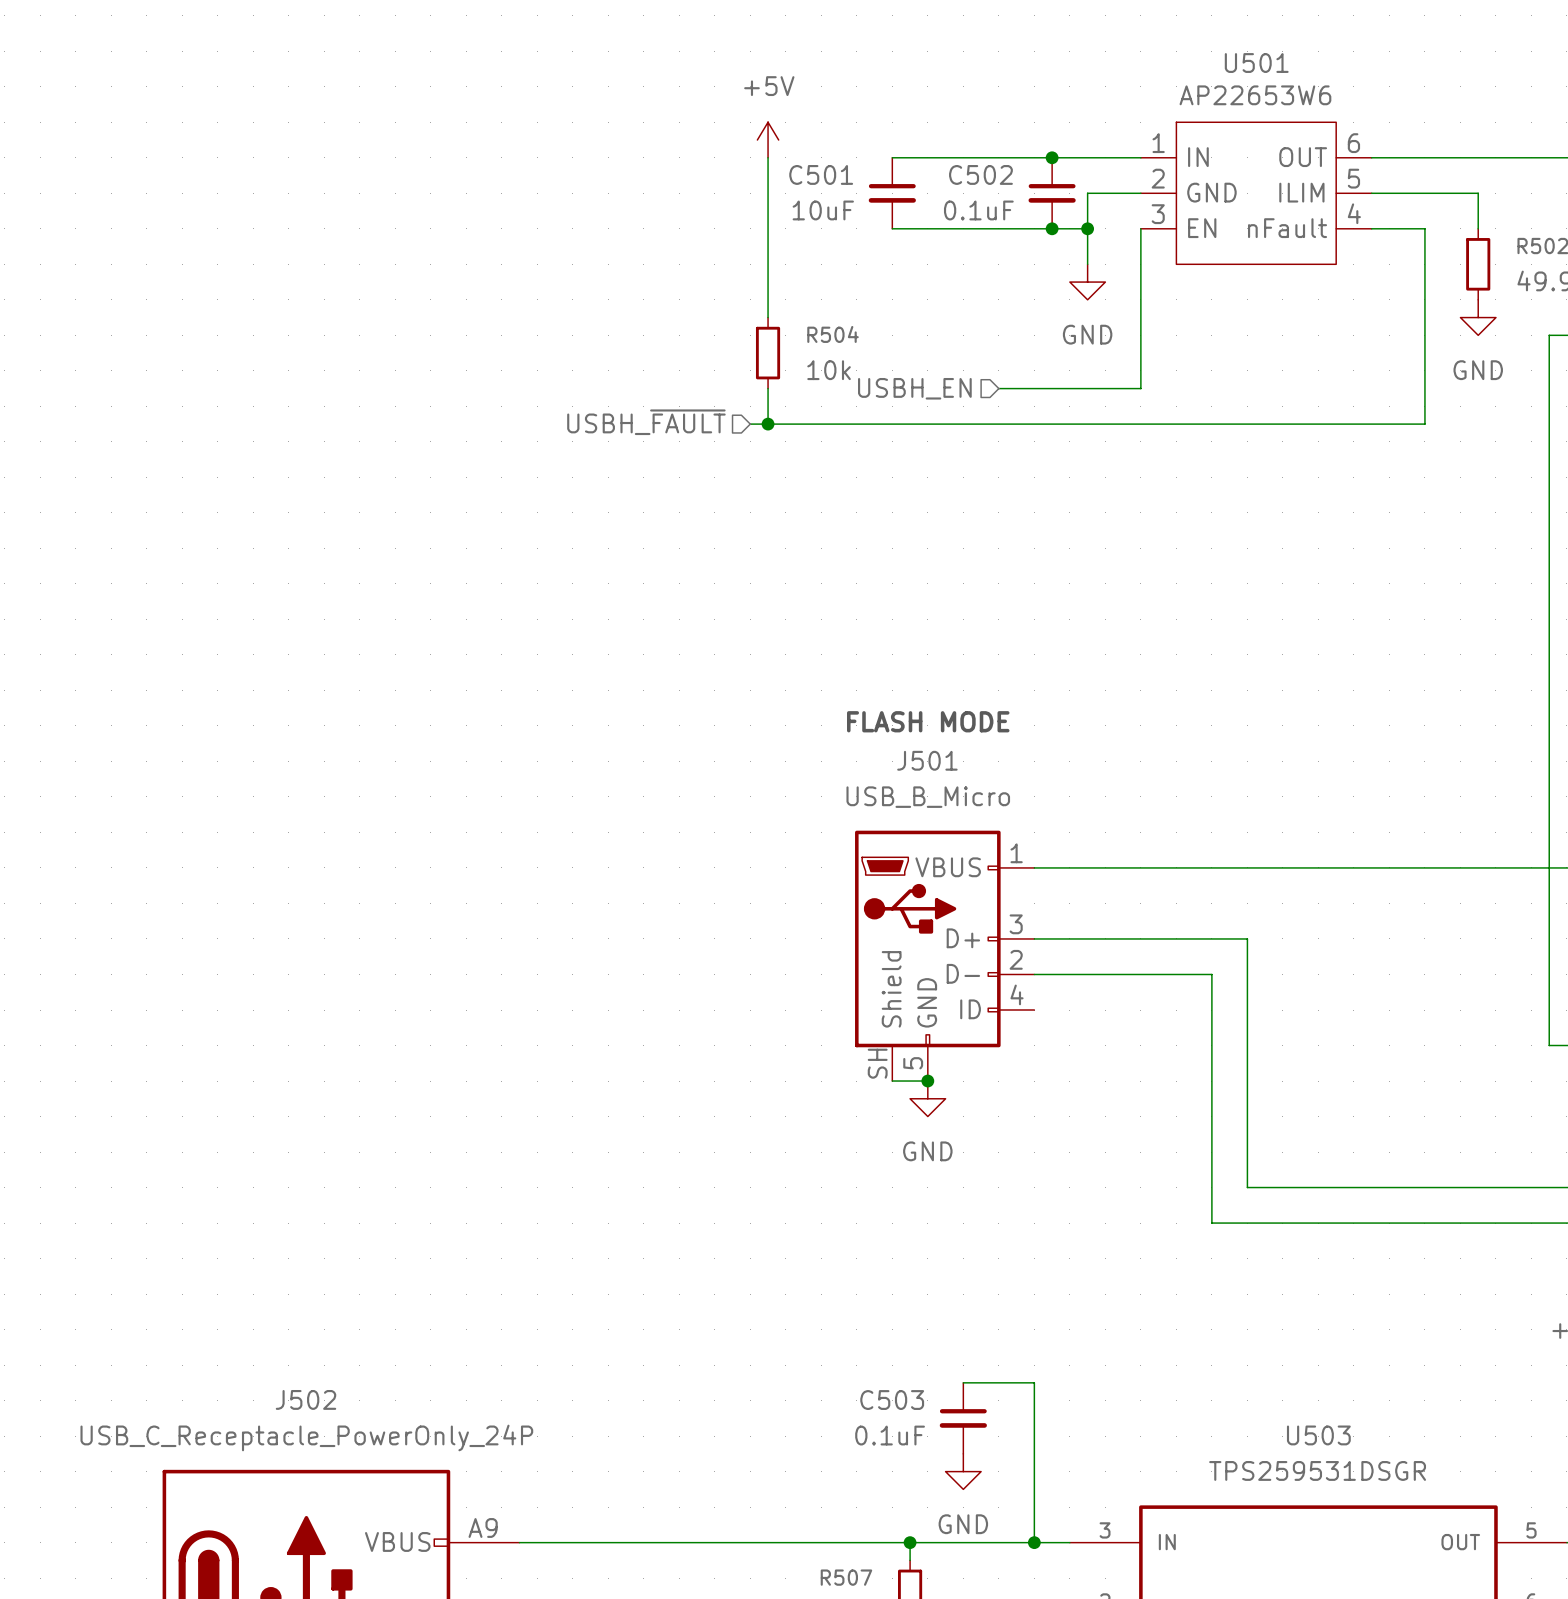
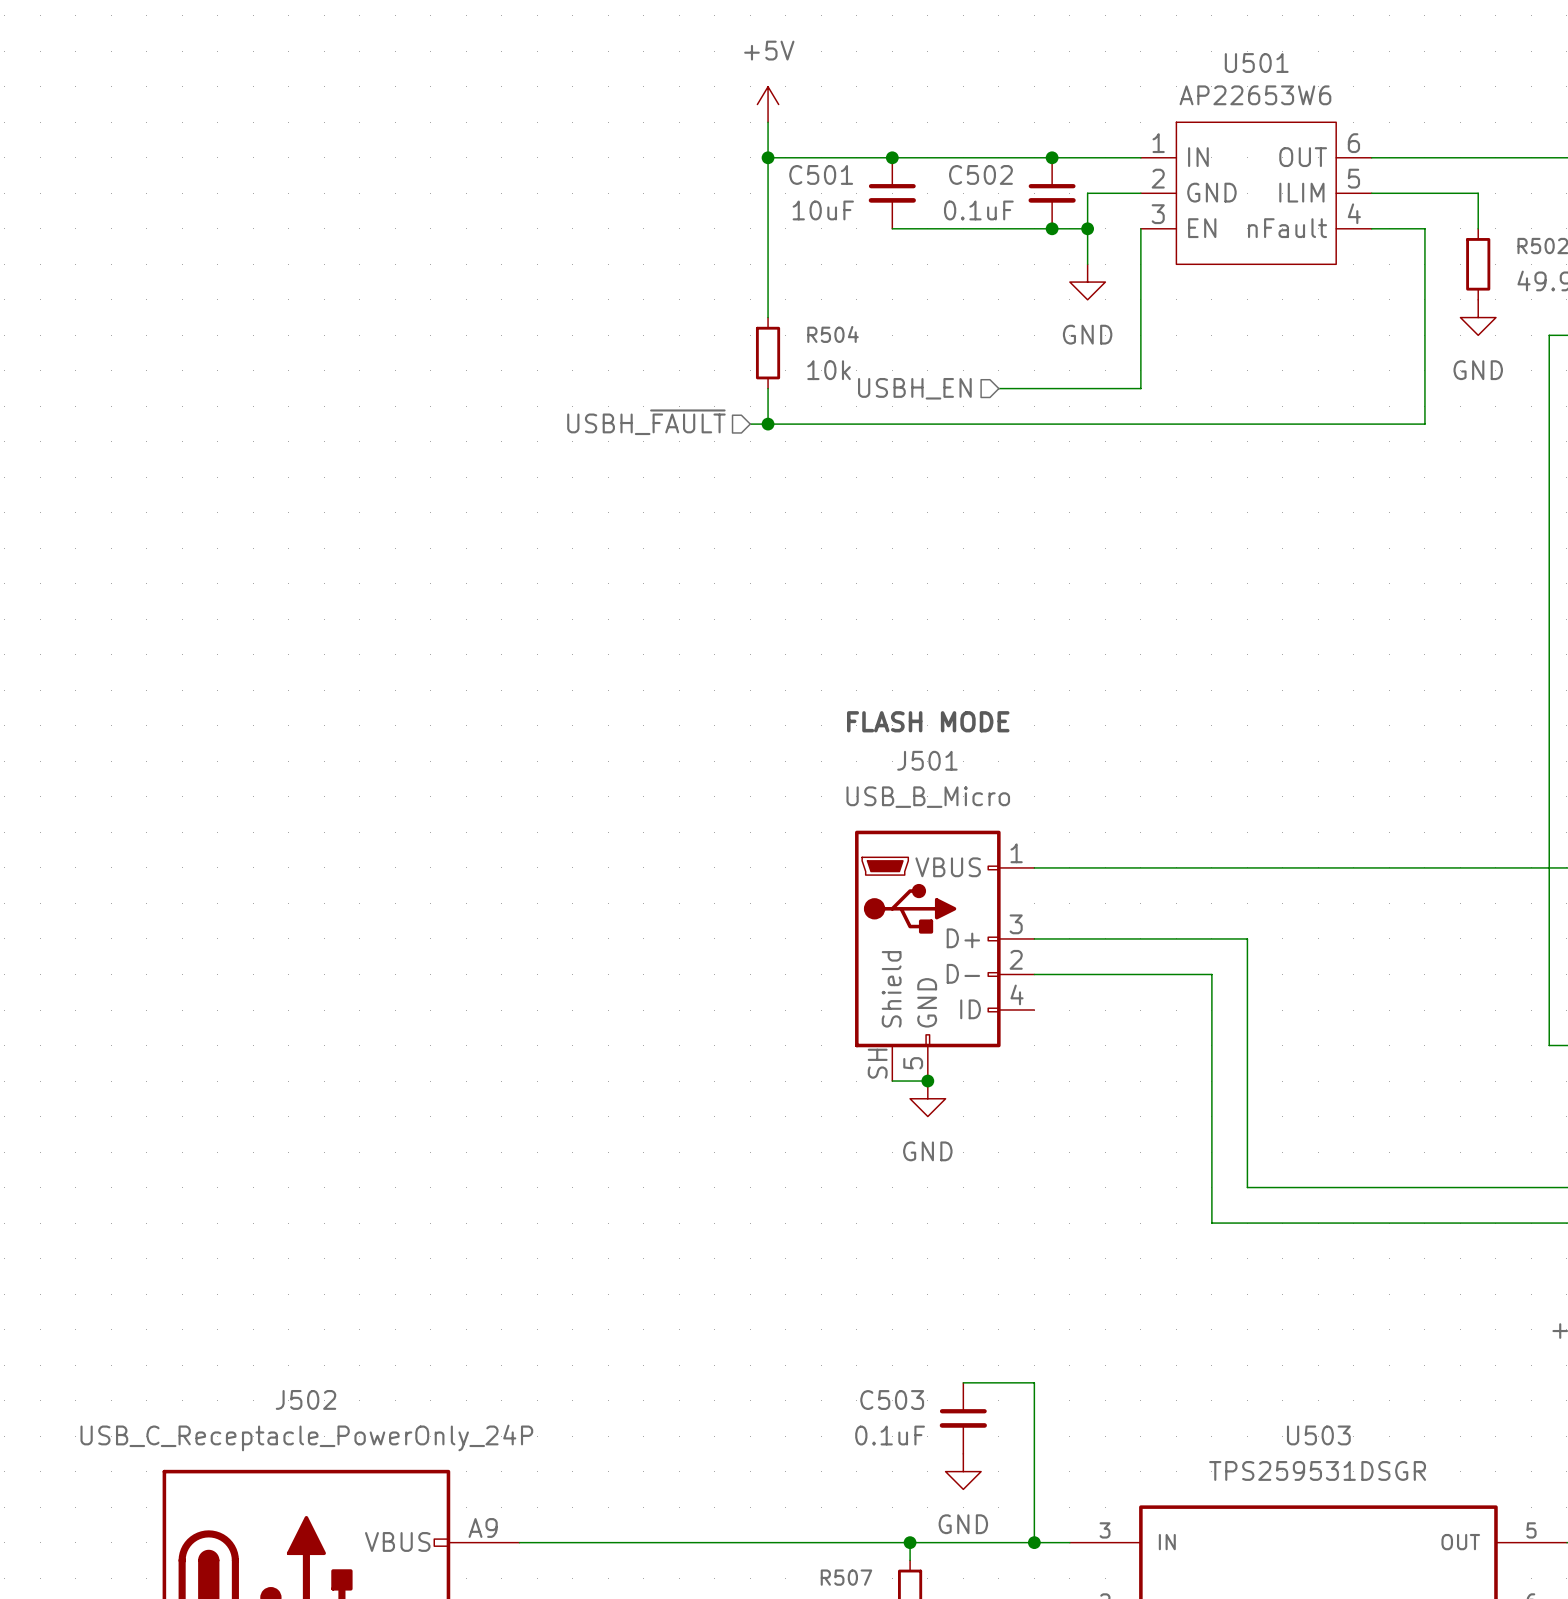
wire: none -> (768, 122) (768, 157) (892, 157)
power symbol position: +5V (768, 140) -> +5V (768, 104)
junction: none -> (768, 157)
junction: none -> (892, 157)

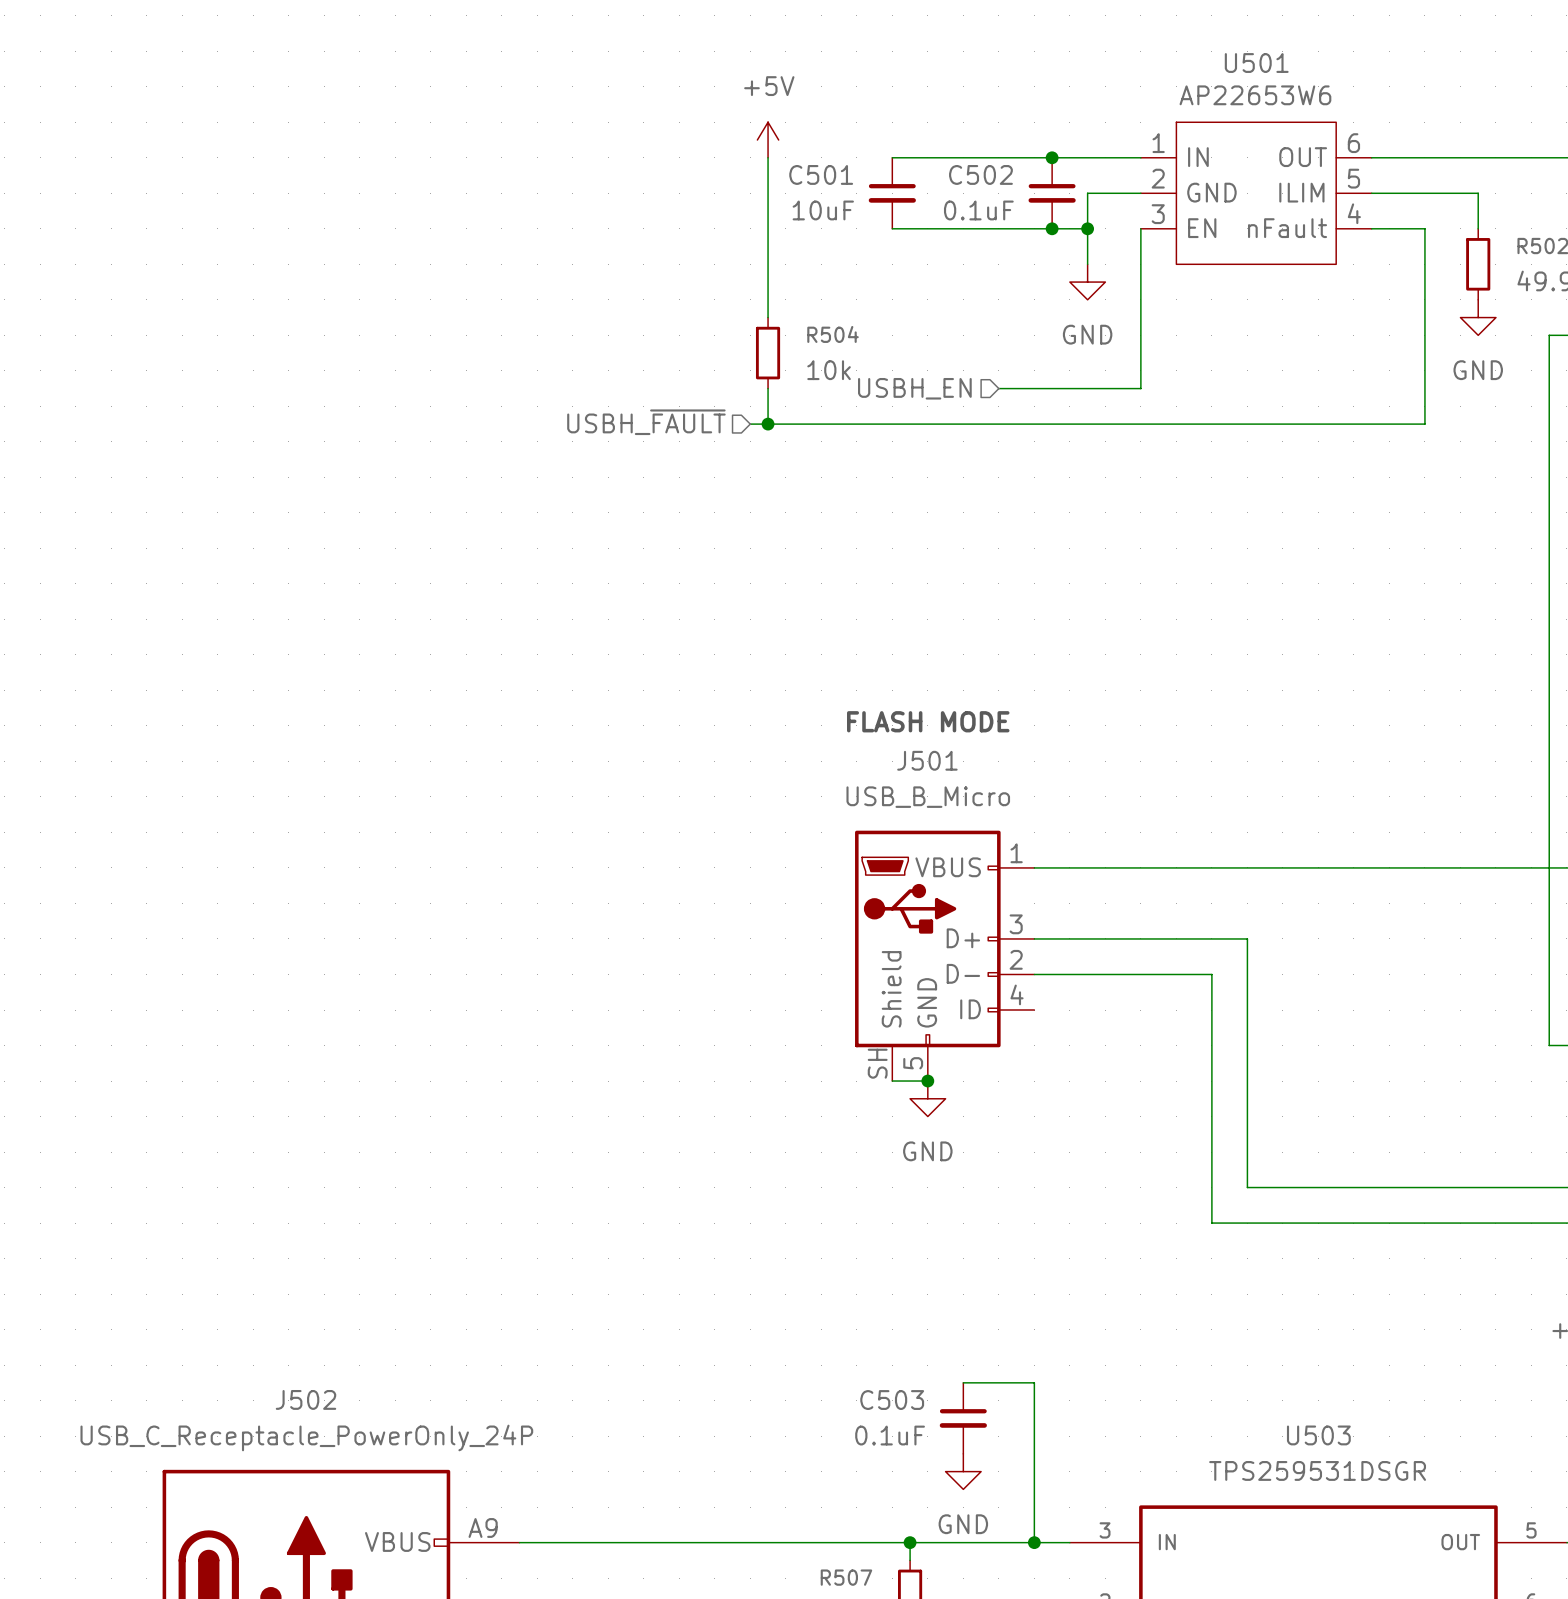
power symbol position: +5V (768, 104) -> +5V (768, 140)
wire: (768, 122) (768, 157) (892, 157) -> none
junction: (768, 157) -> none
junction: (892, 157) -> none

